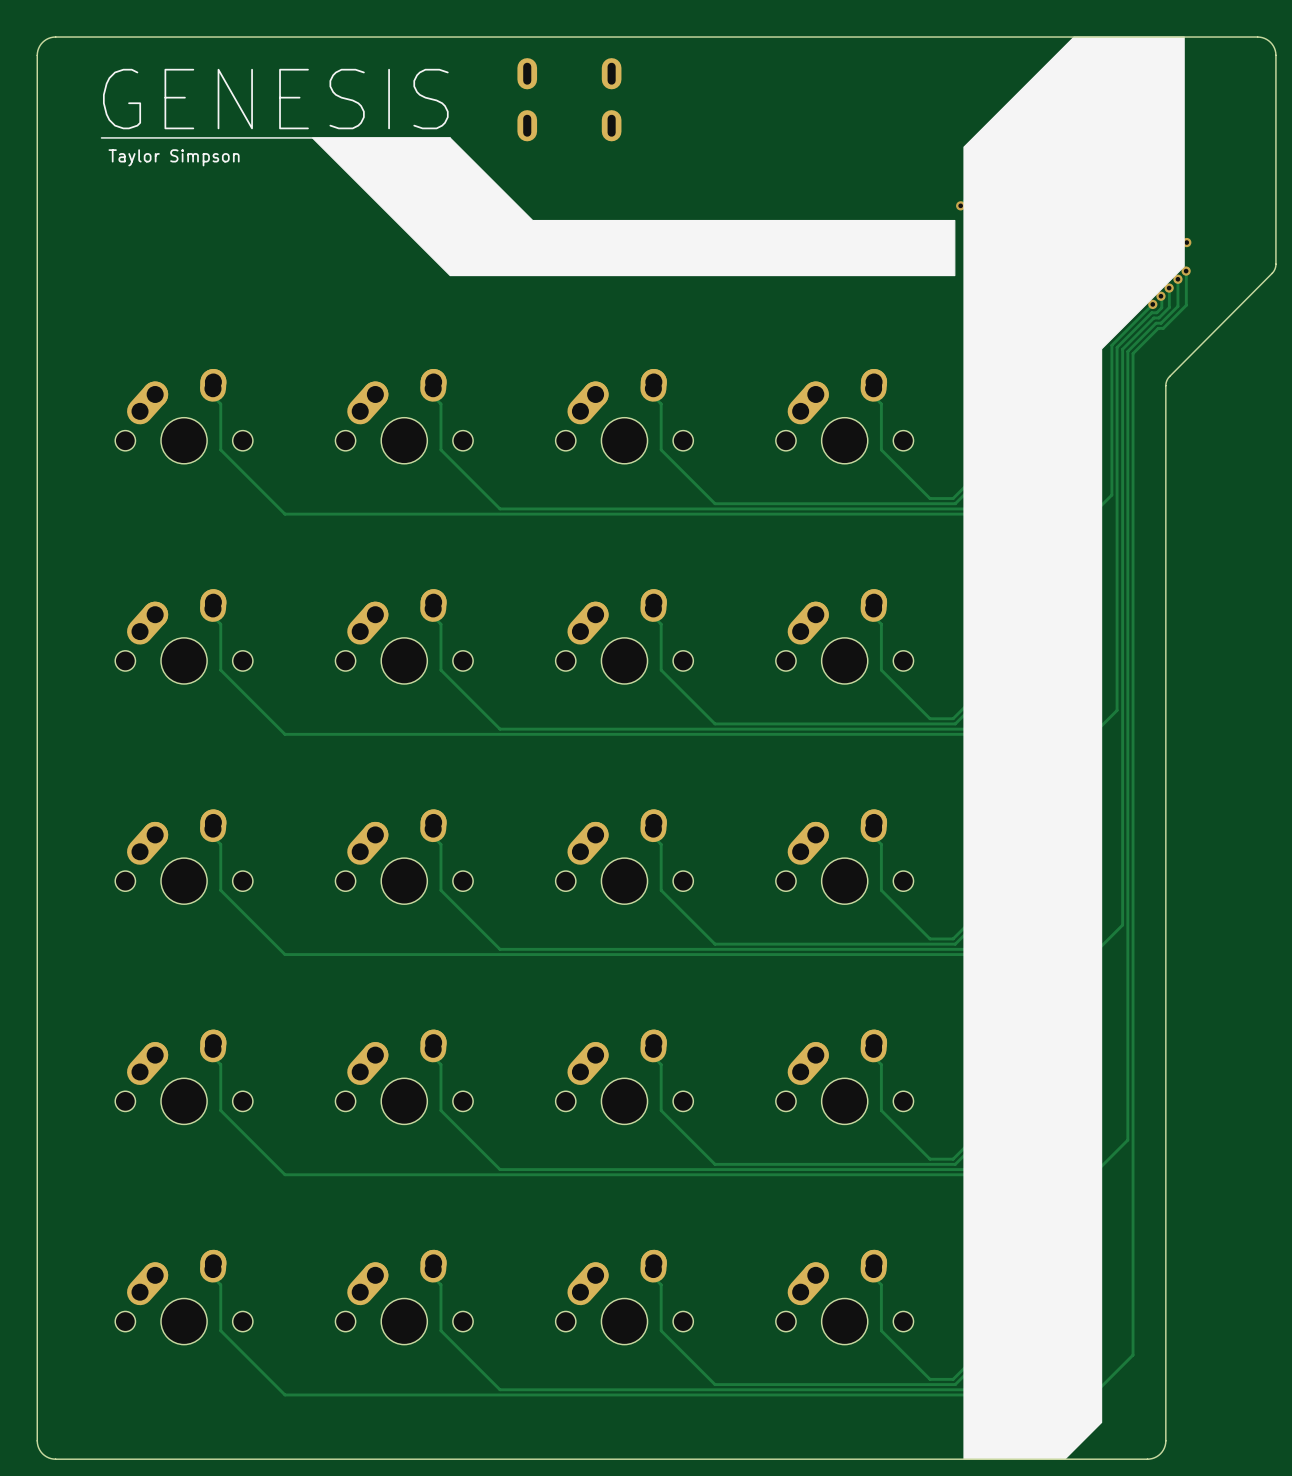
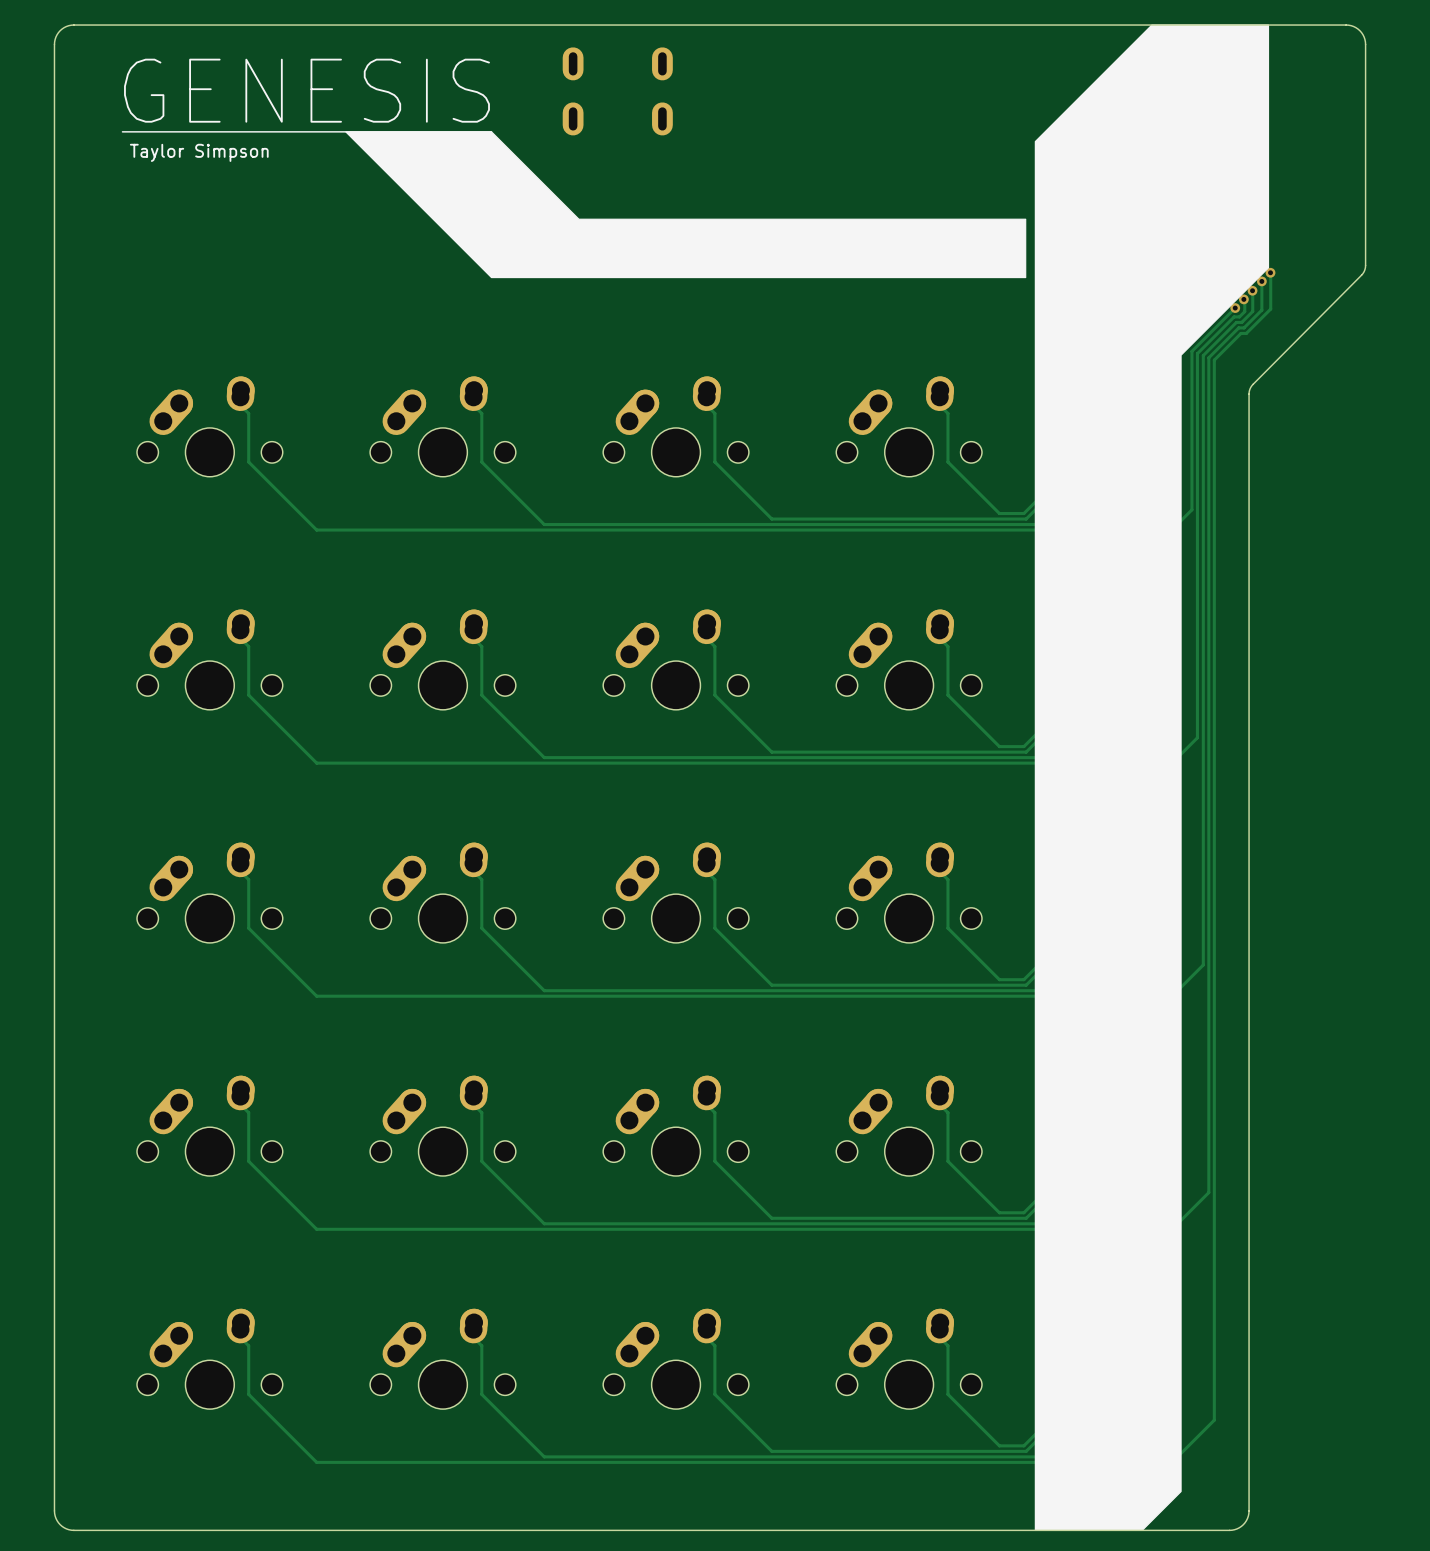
via: (960, 205) -> none
via: (1186, 242) -> none

